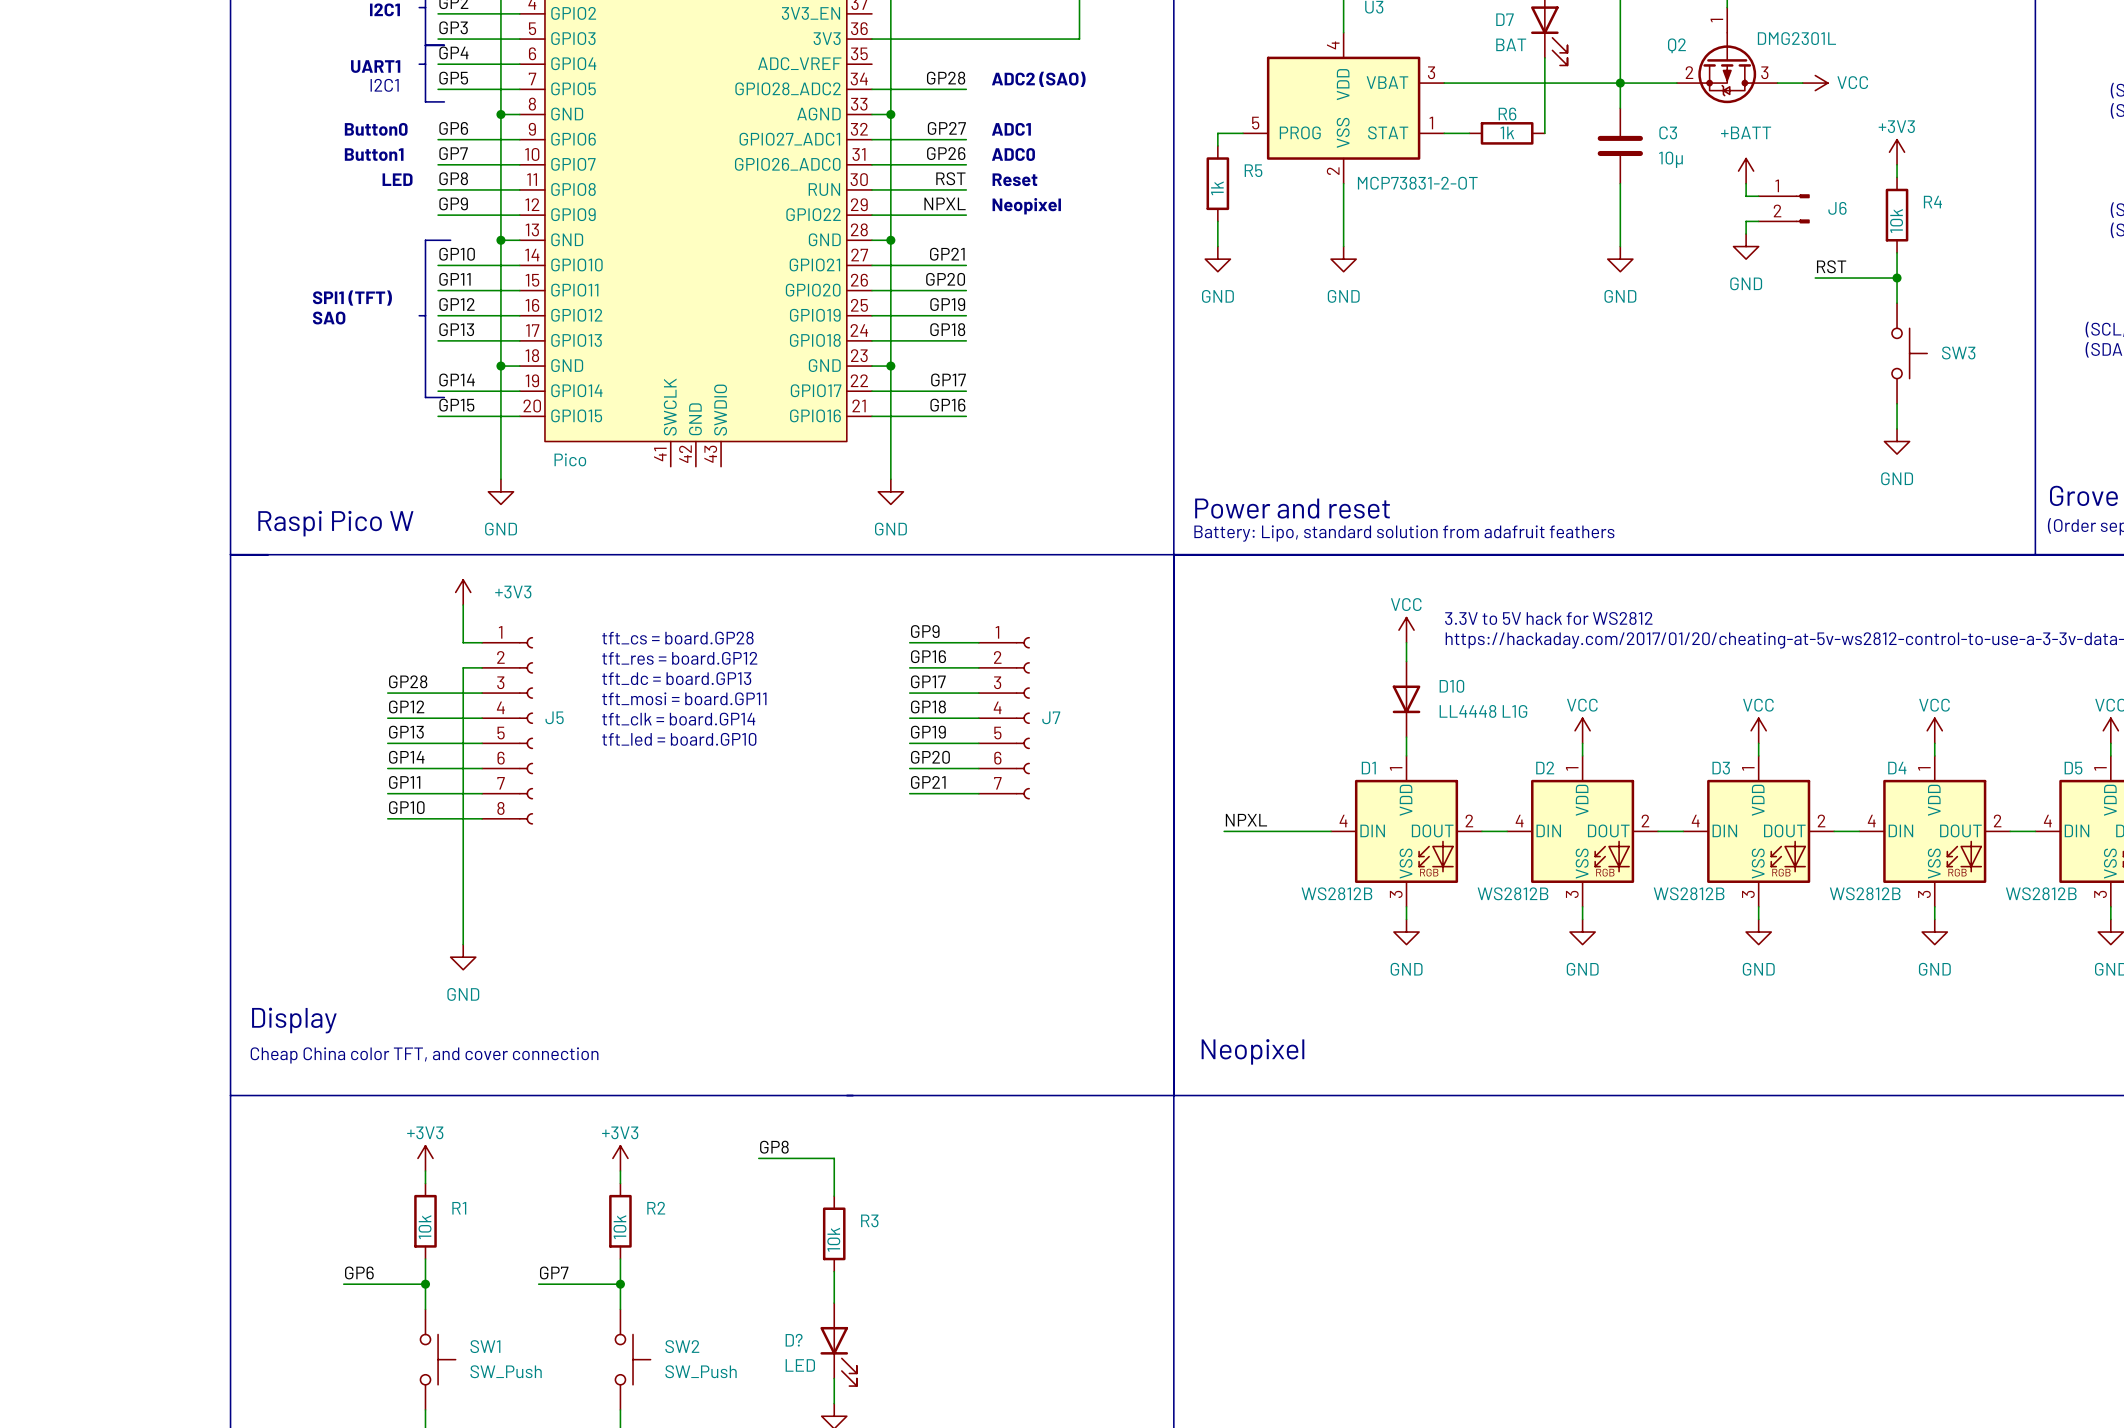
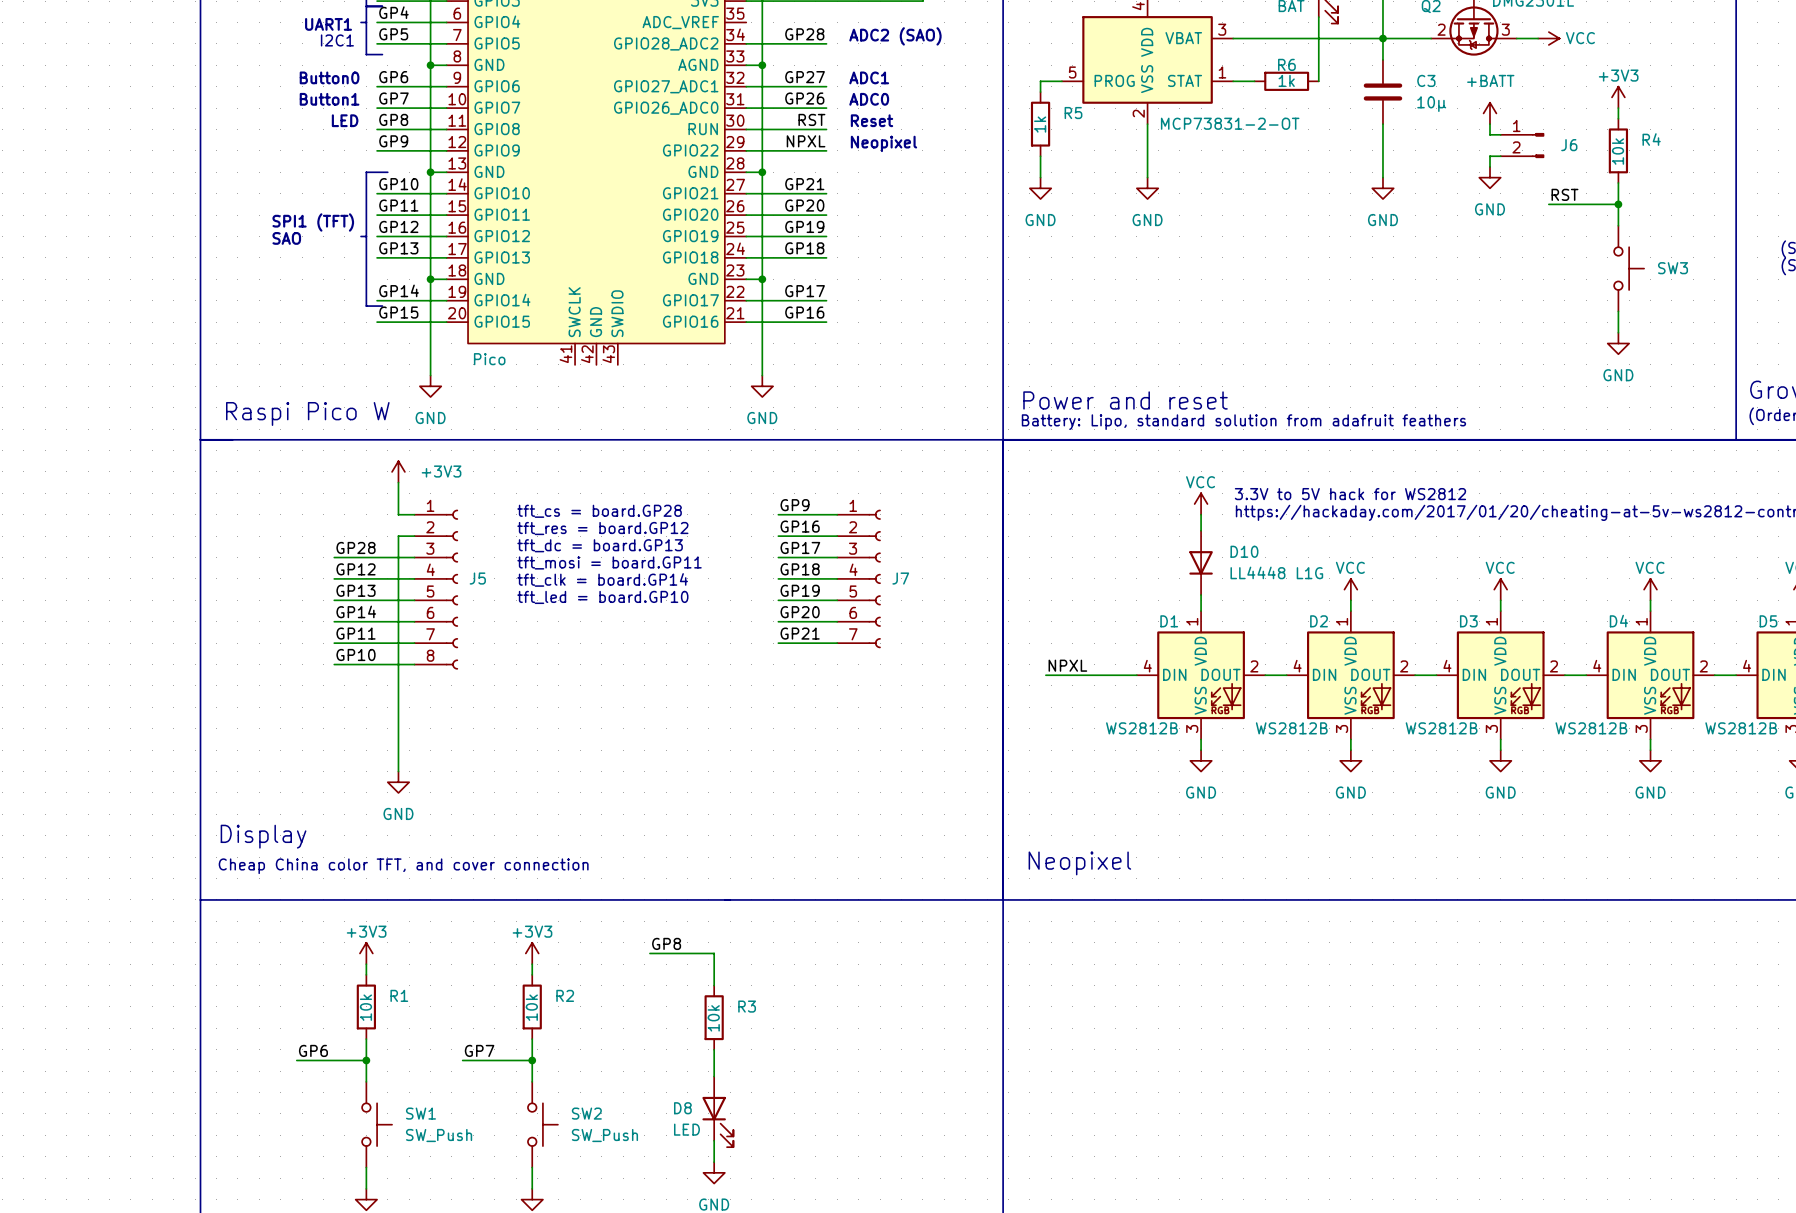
D? name: D? (794, 1340) -> D8 (682, 1108)

